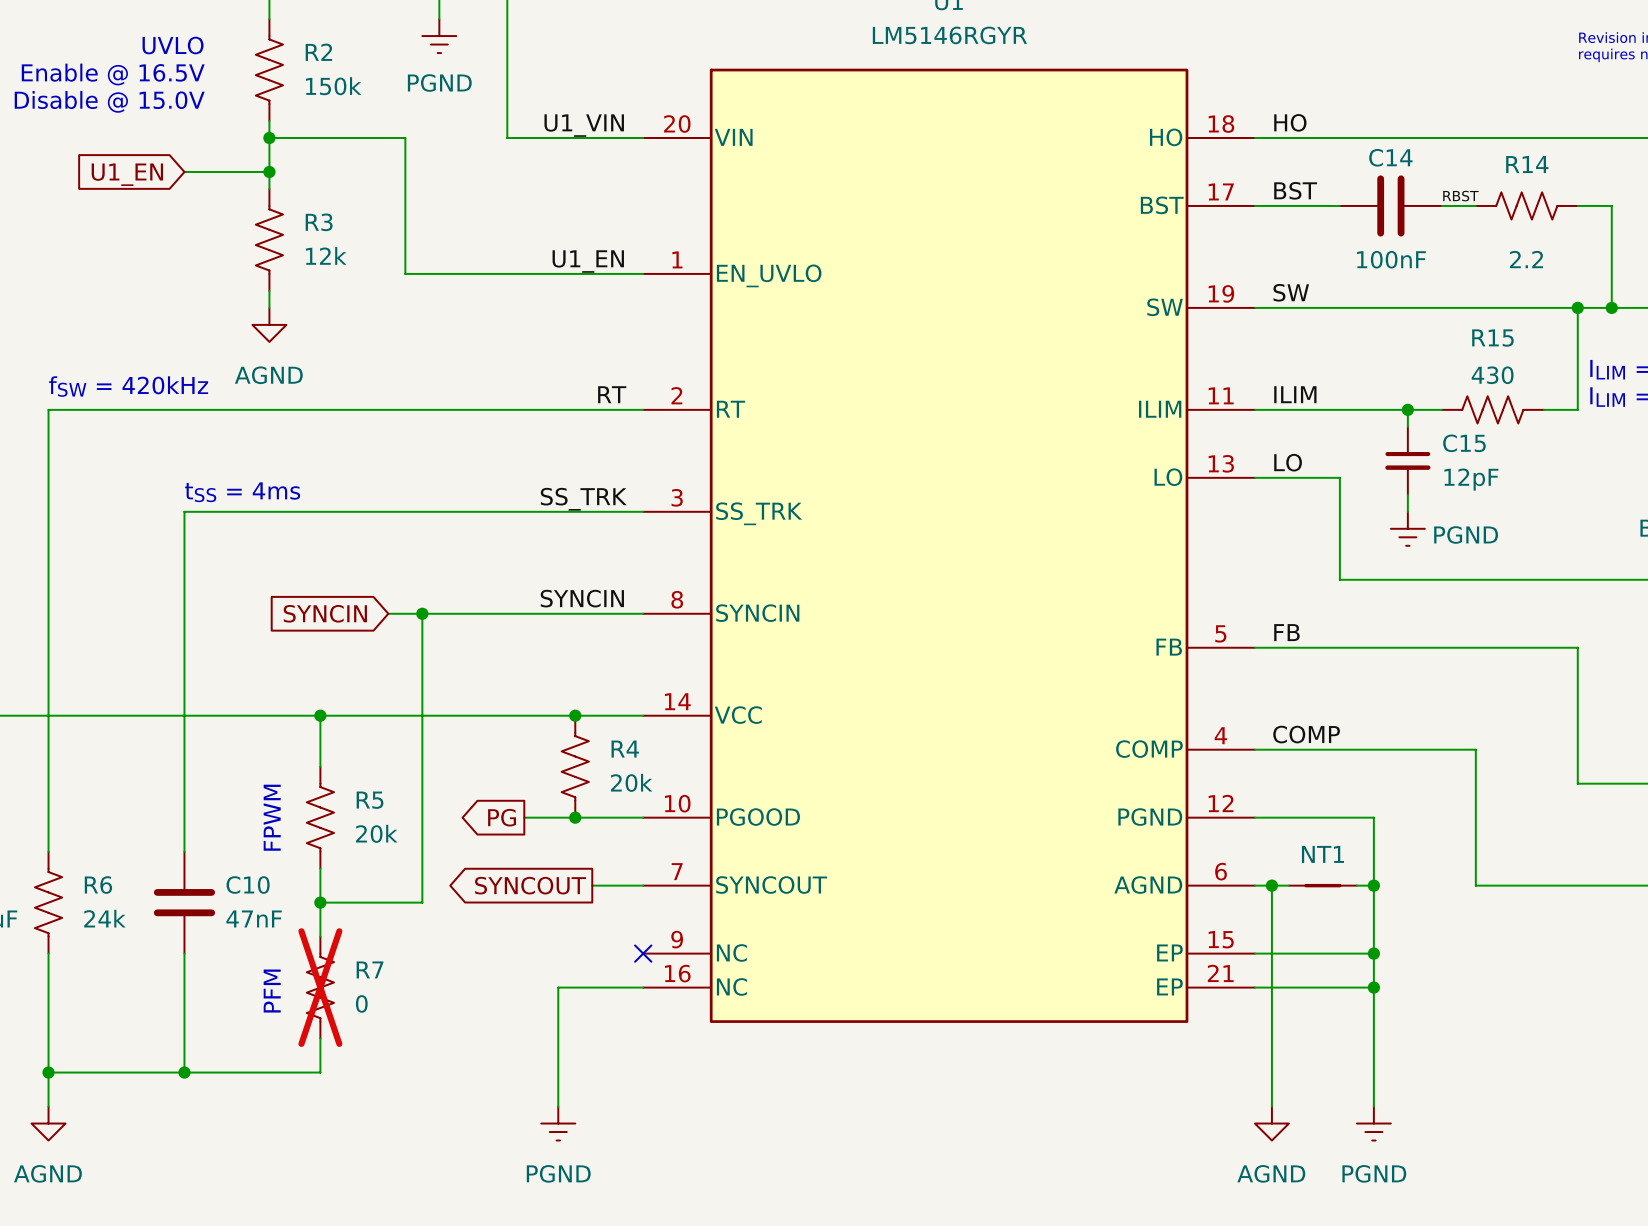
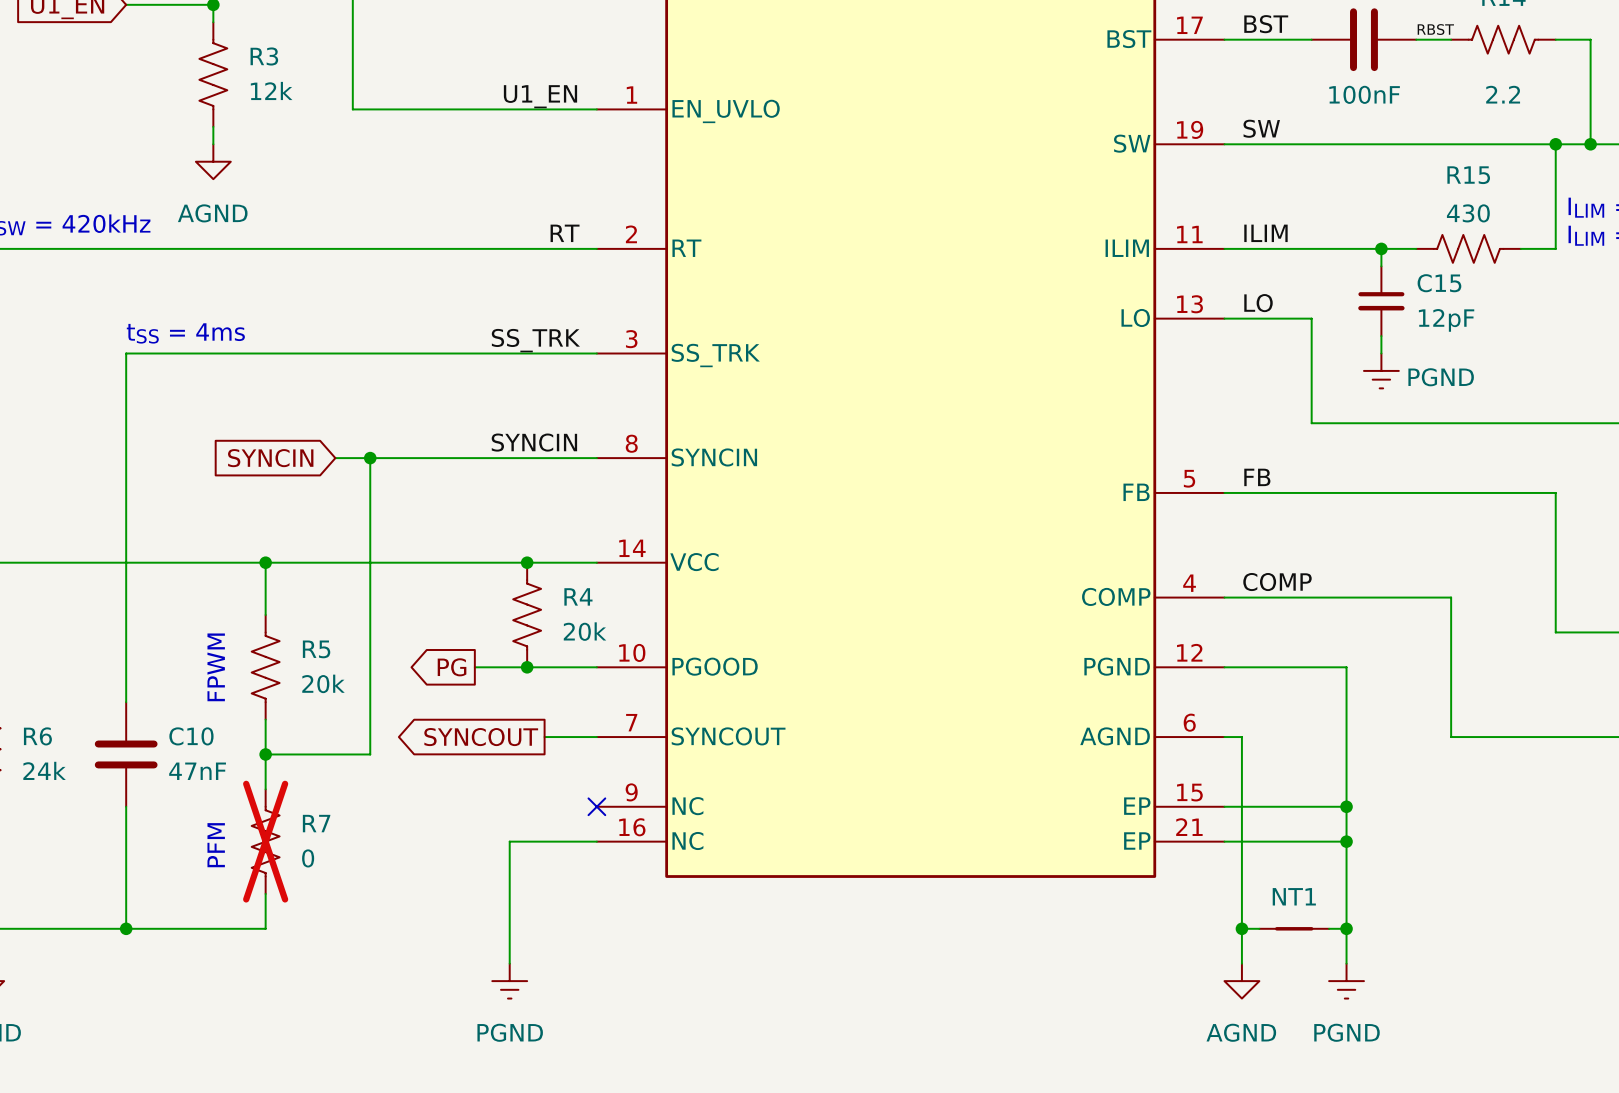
wire: (1271, 885) (1288, 885) -> (1241, 928) (1259, 928)
junction: (1271, 885) -> none
NT1 position: (1322, 885) -> (1294, 928)
wire: (1356, 885) (1373, 885) -> (1329, 928) (1346, 928)
junction: (1373, 885) -> none
junction: none -> (1241, 928)
junction: none -> (1346, 928)

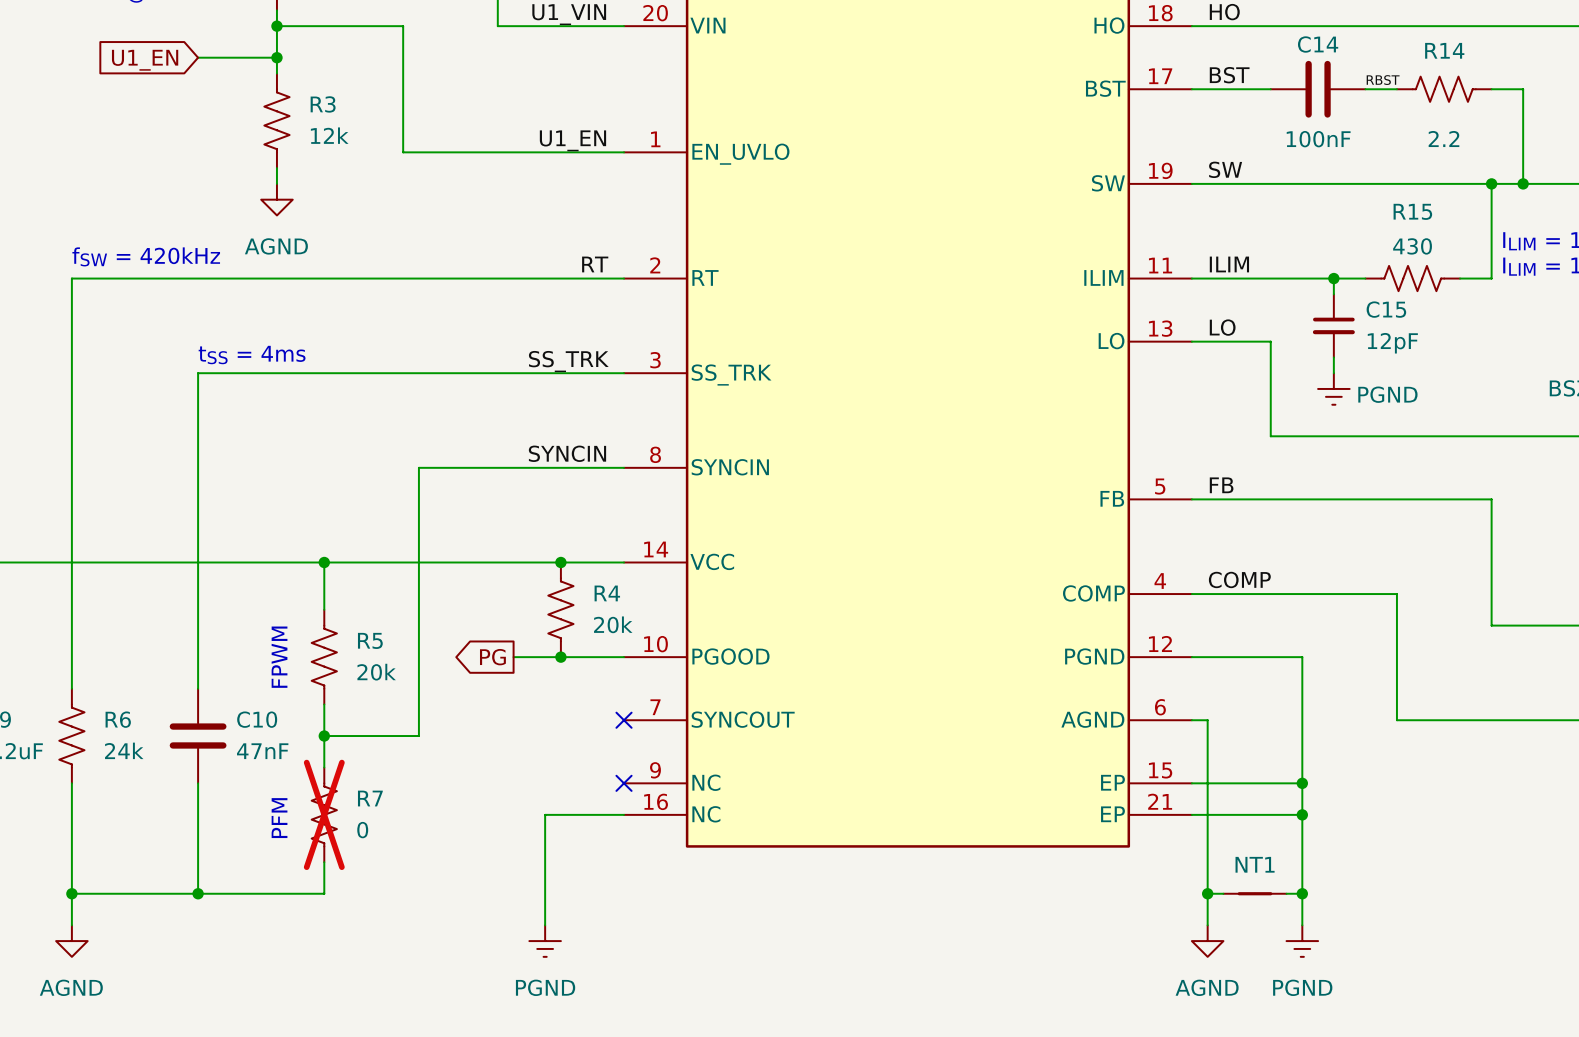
global label: SYNCIN (270, 458) -> none
wire: (335, 458) (370, 458) -> none
junction: (370, 458) -> none
global label: SYNCOUT (481, 737) -> none
wire: (544, 737) (596, 737) -> none
no-connect mark: none -> (624, 720)

